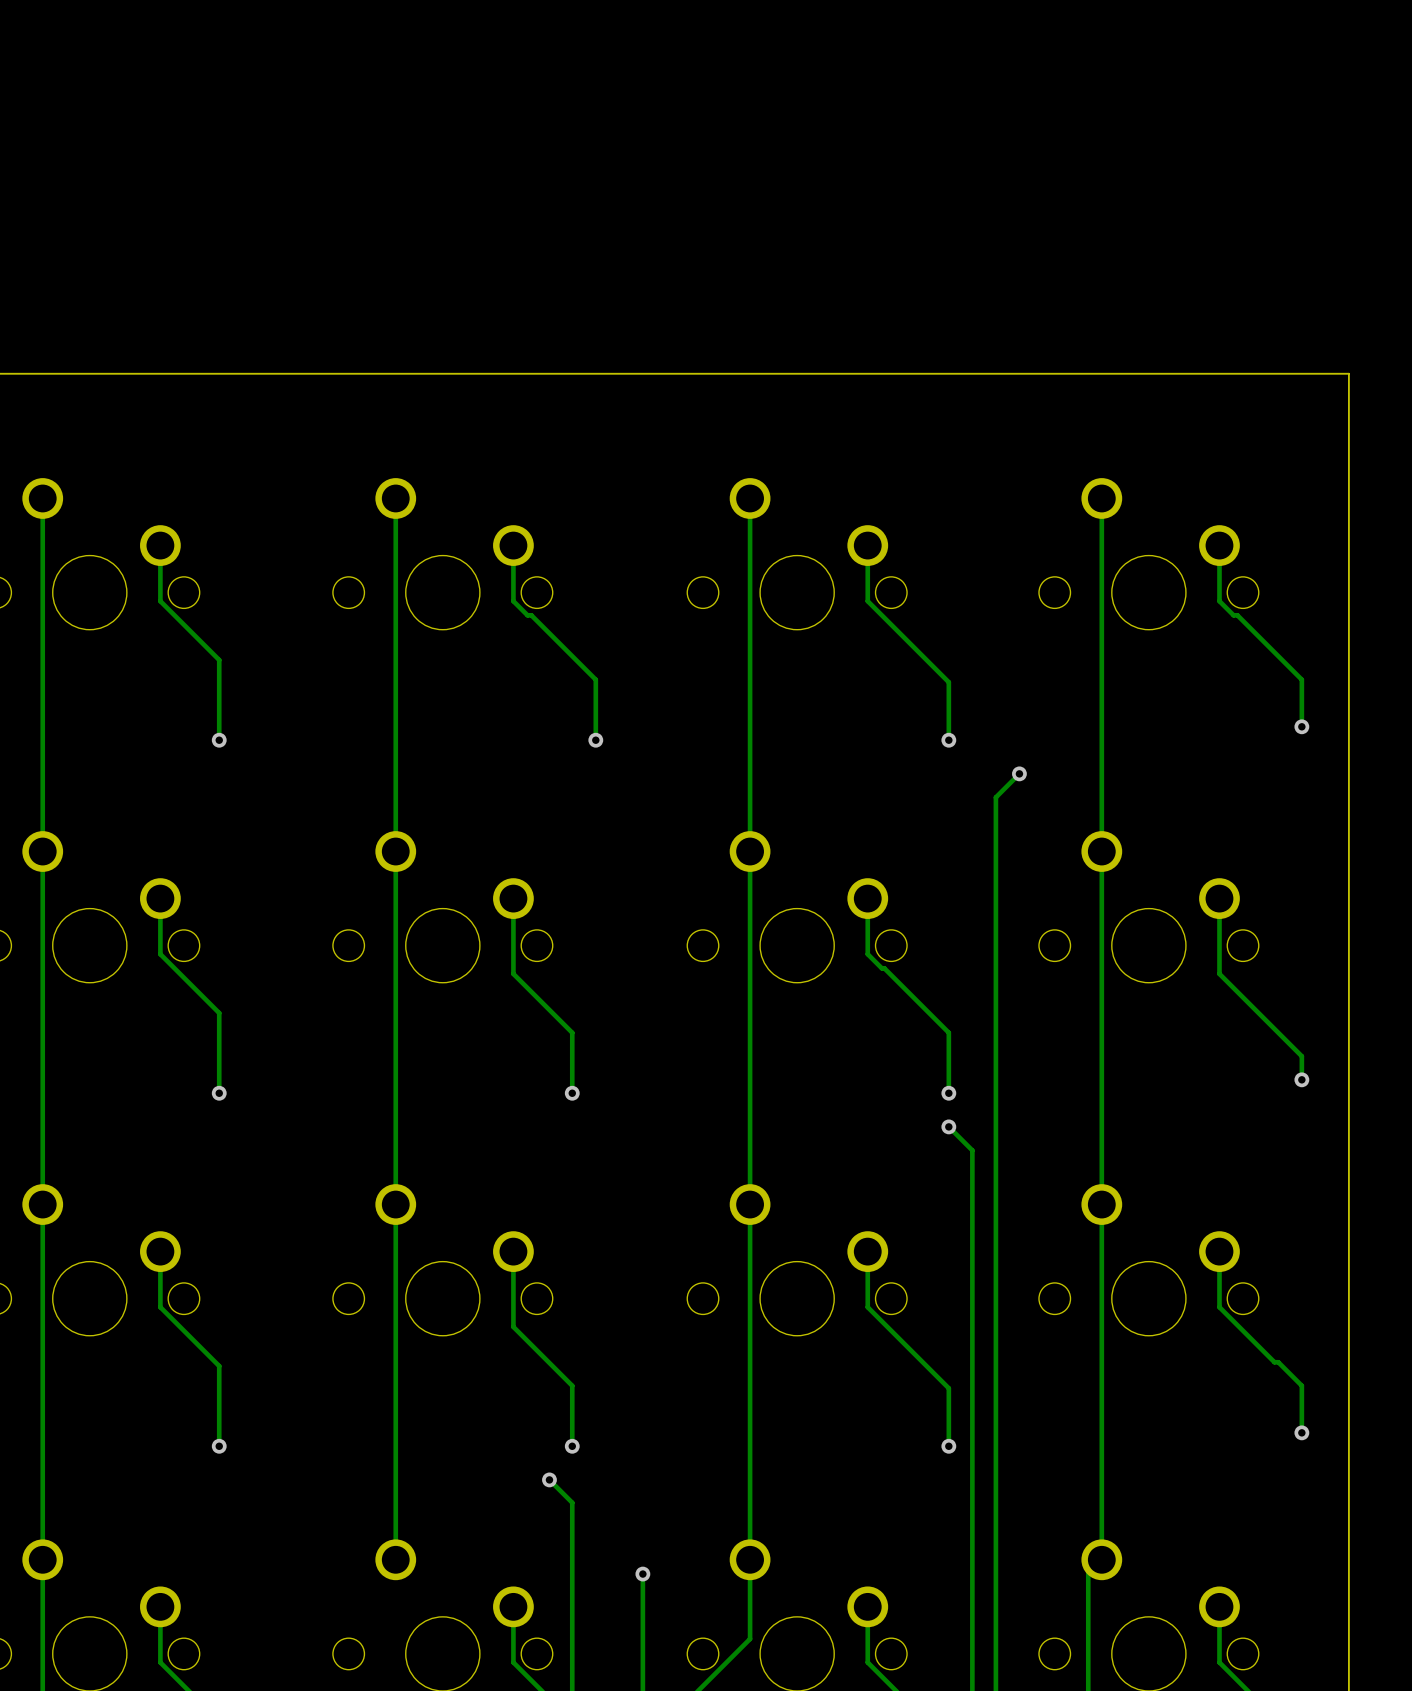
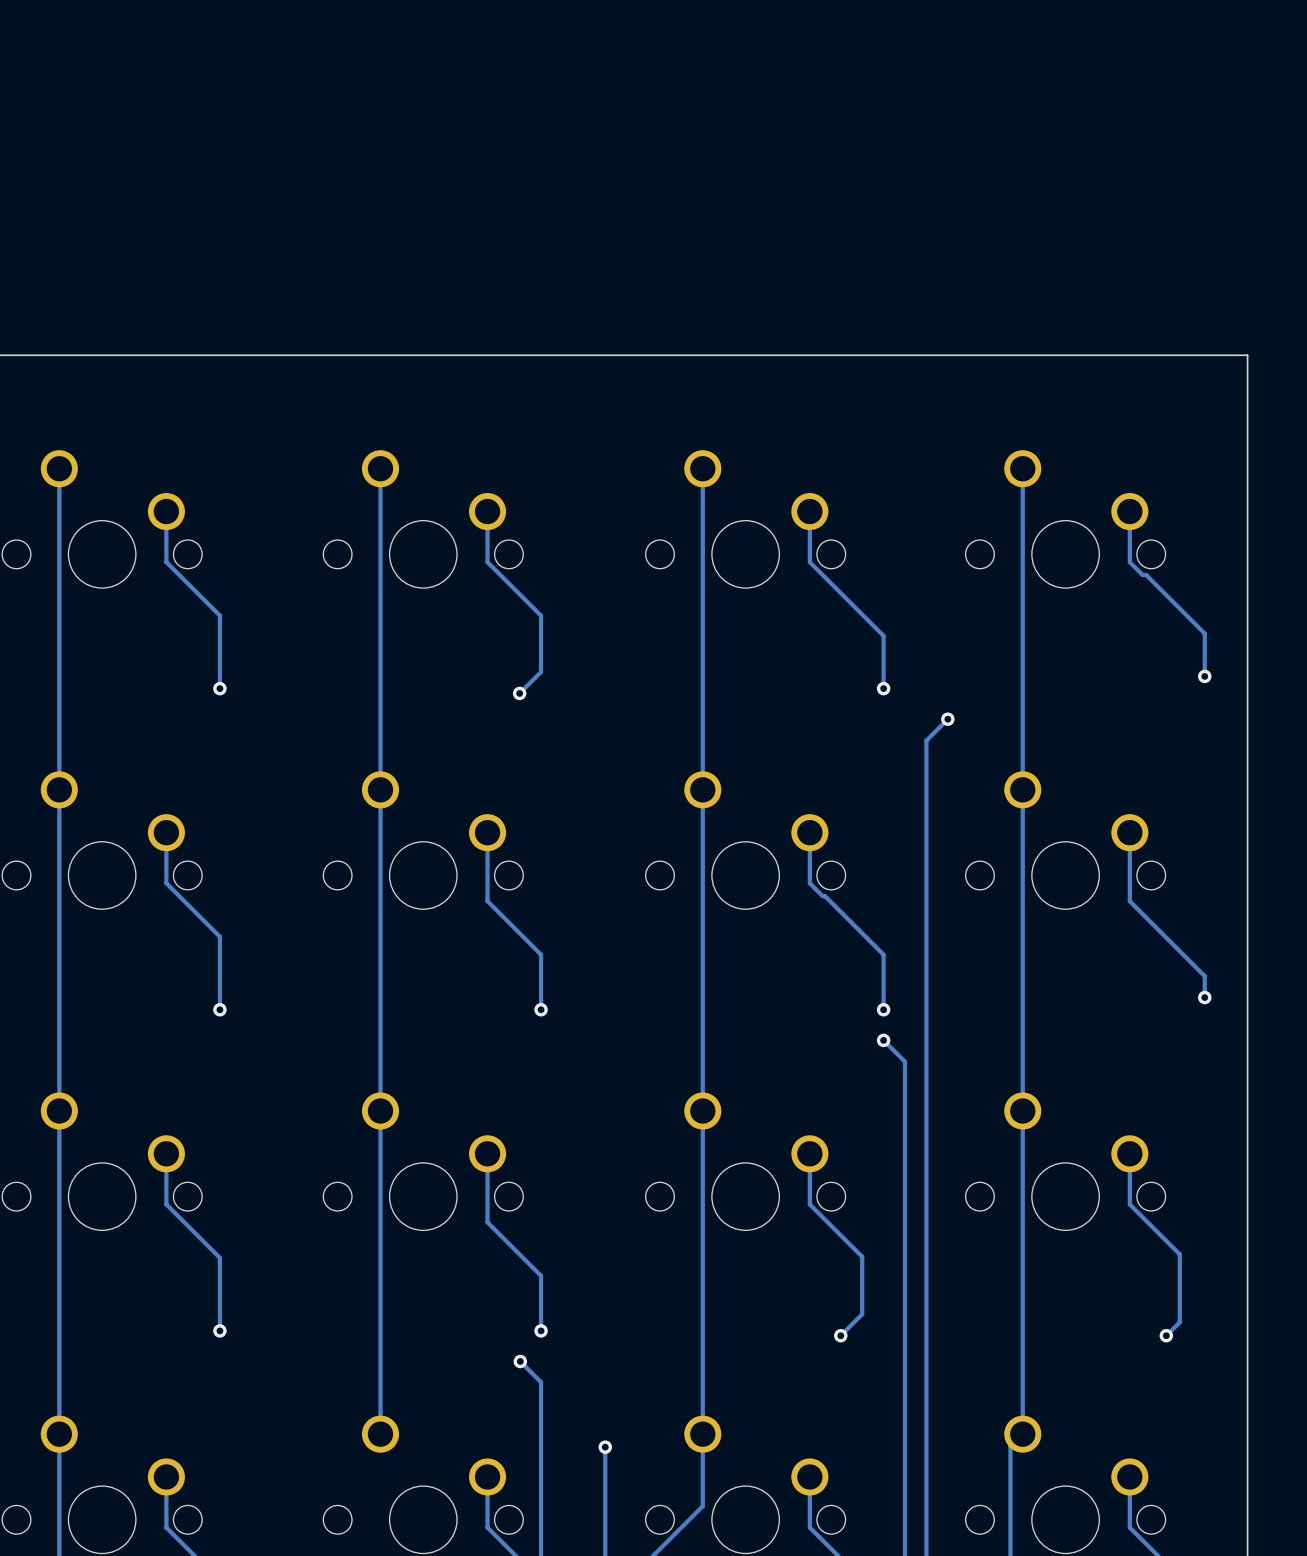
track: (527, 615) (531, 615) (595, 679) (595, 740) -> (500, 575) (541, 615) (541, 672) (519, 693)
via position: (595, 740) -> (519, 693)
track: (1274, 1362) (1278, 1362) (1301, 1385) (1301, 1432) -> (1179, 1254) (1179, 1322) (1166, 1335)
track: (925, 1364) (948, 1388) (948, 1446) -> (862, 1256) (862, 1314) (840, 1335)
via position: (1301, 1432) -> (1166, 1335)
via position: (948, 1446) -> (840, 1335)

